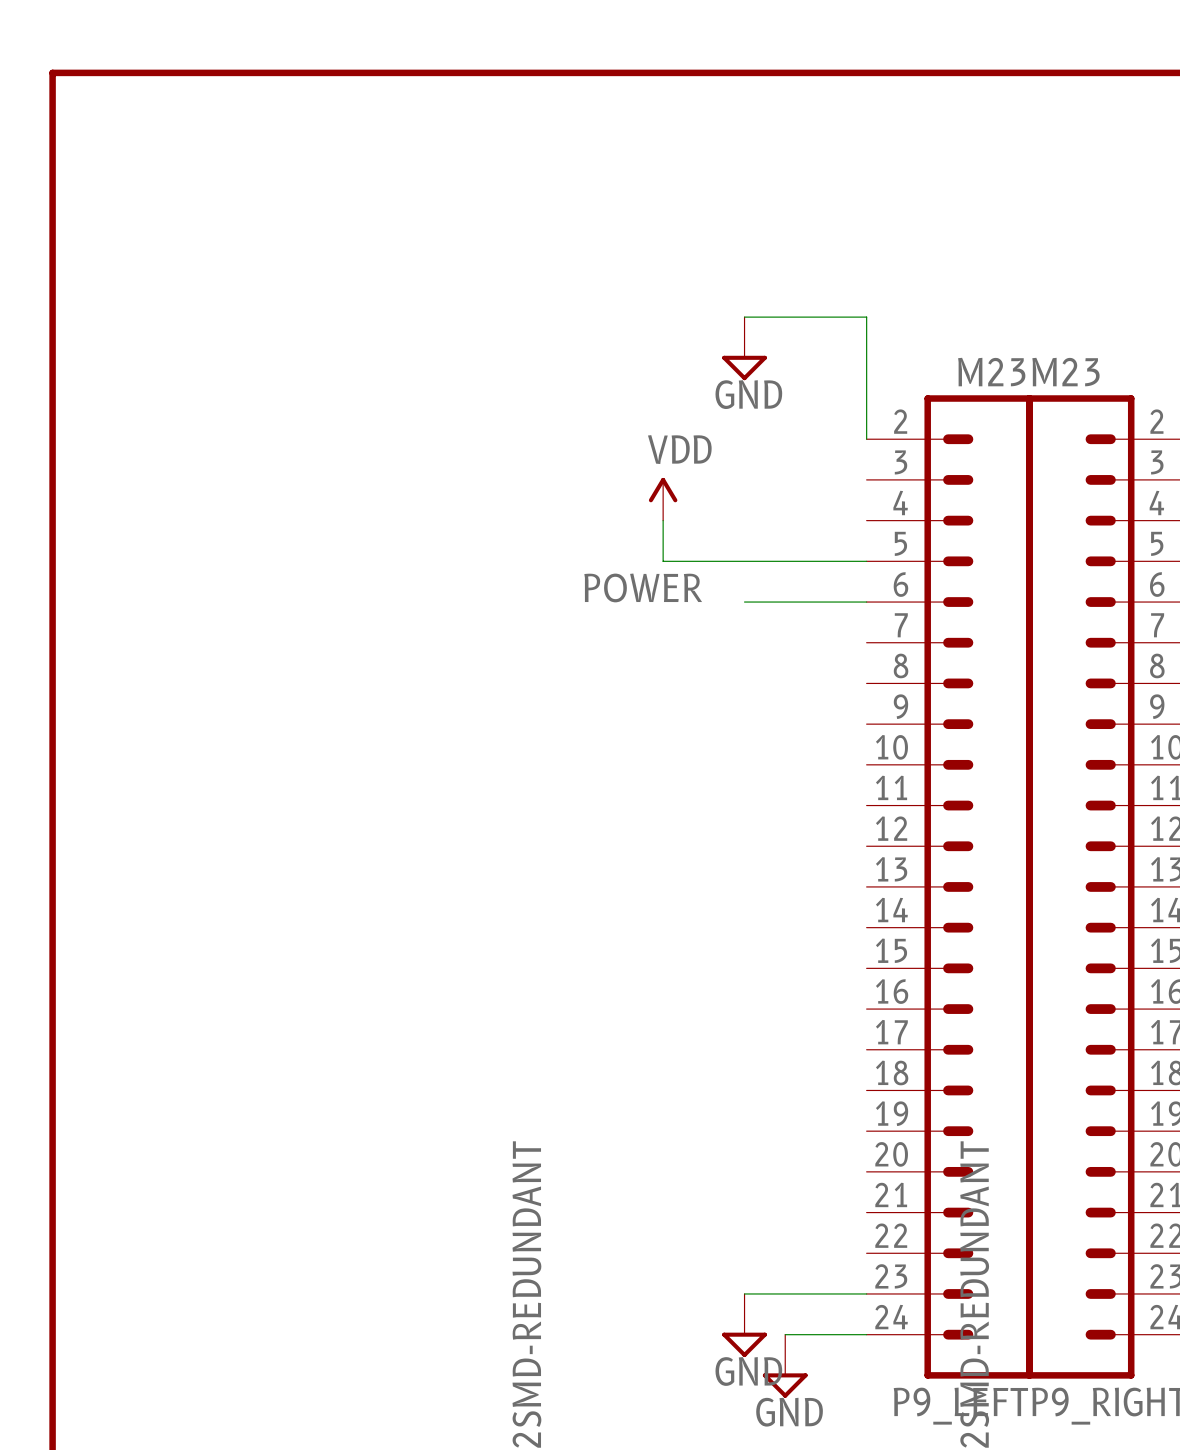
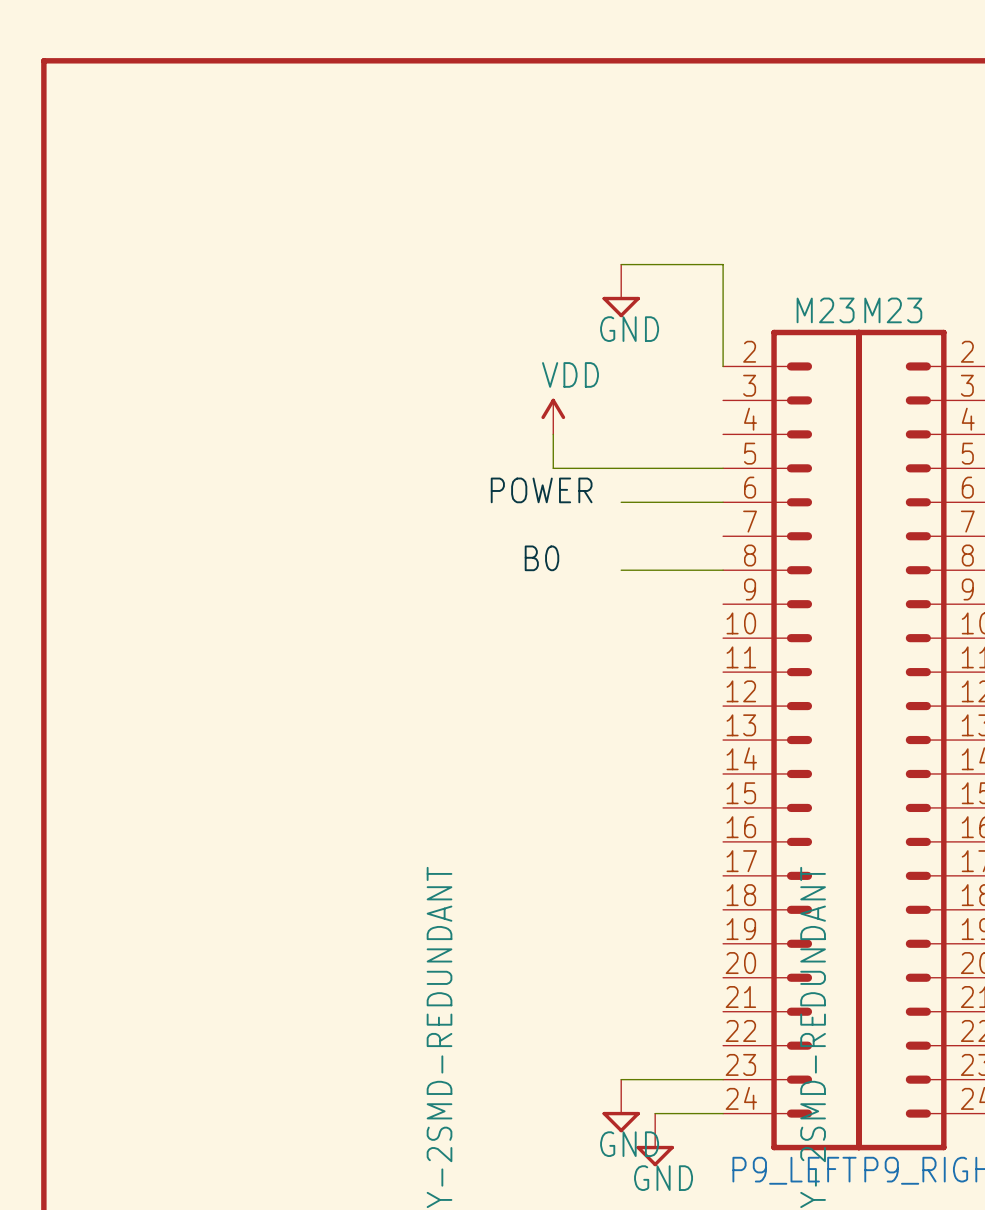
label: none -> B0 (541, 558)
wire: none -> (621, 570) (723, 570)

